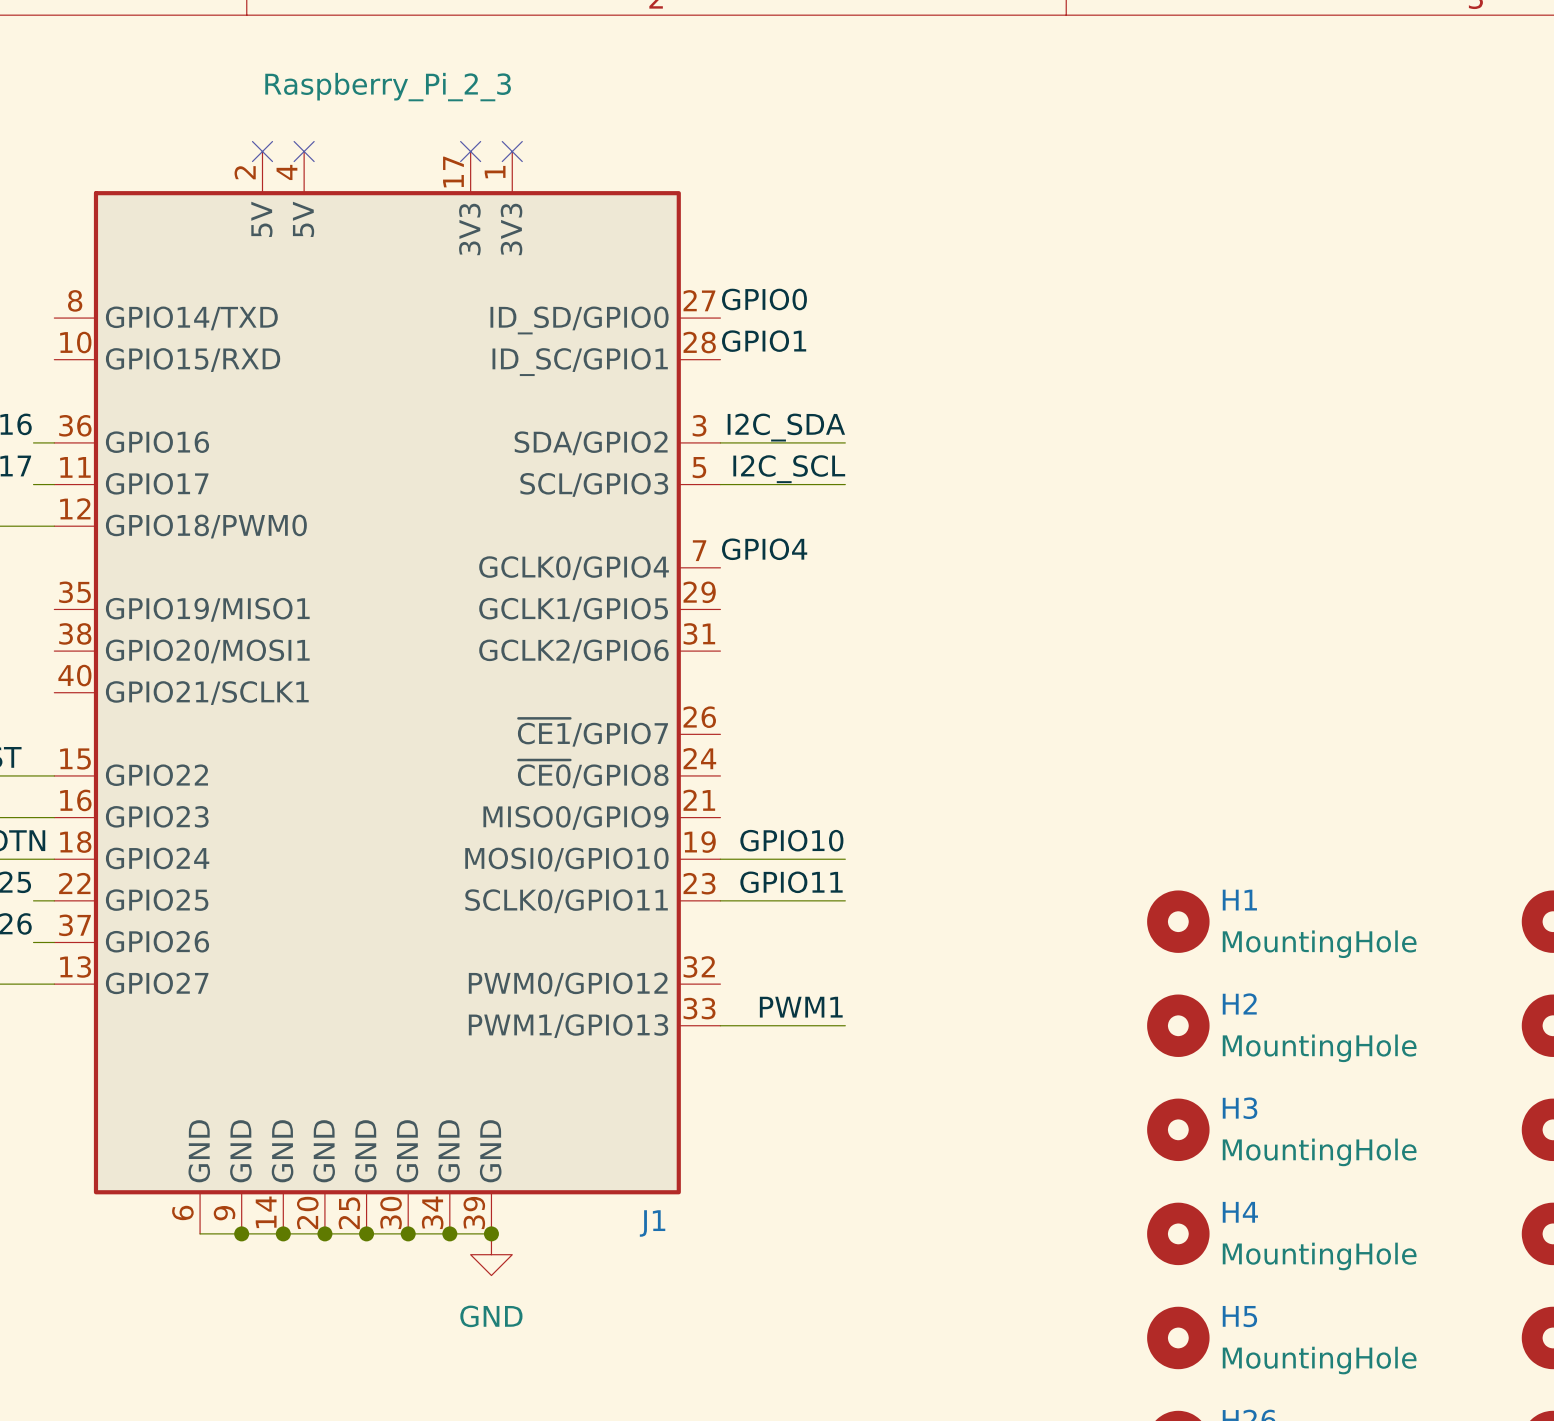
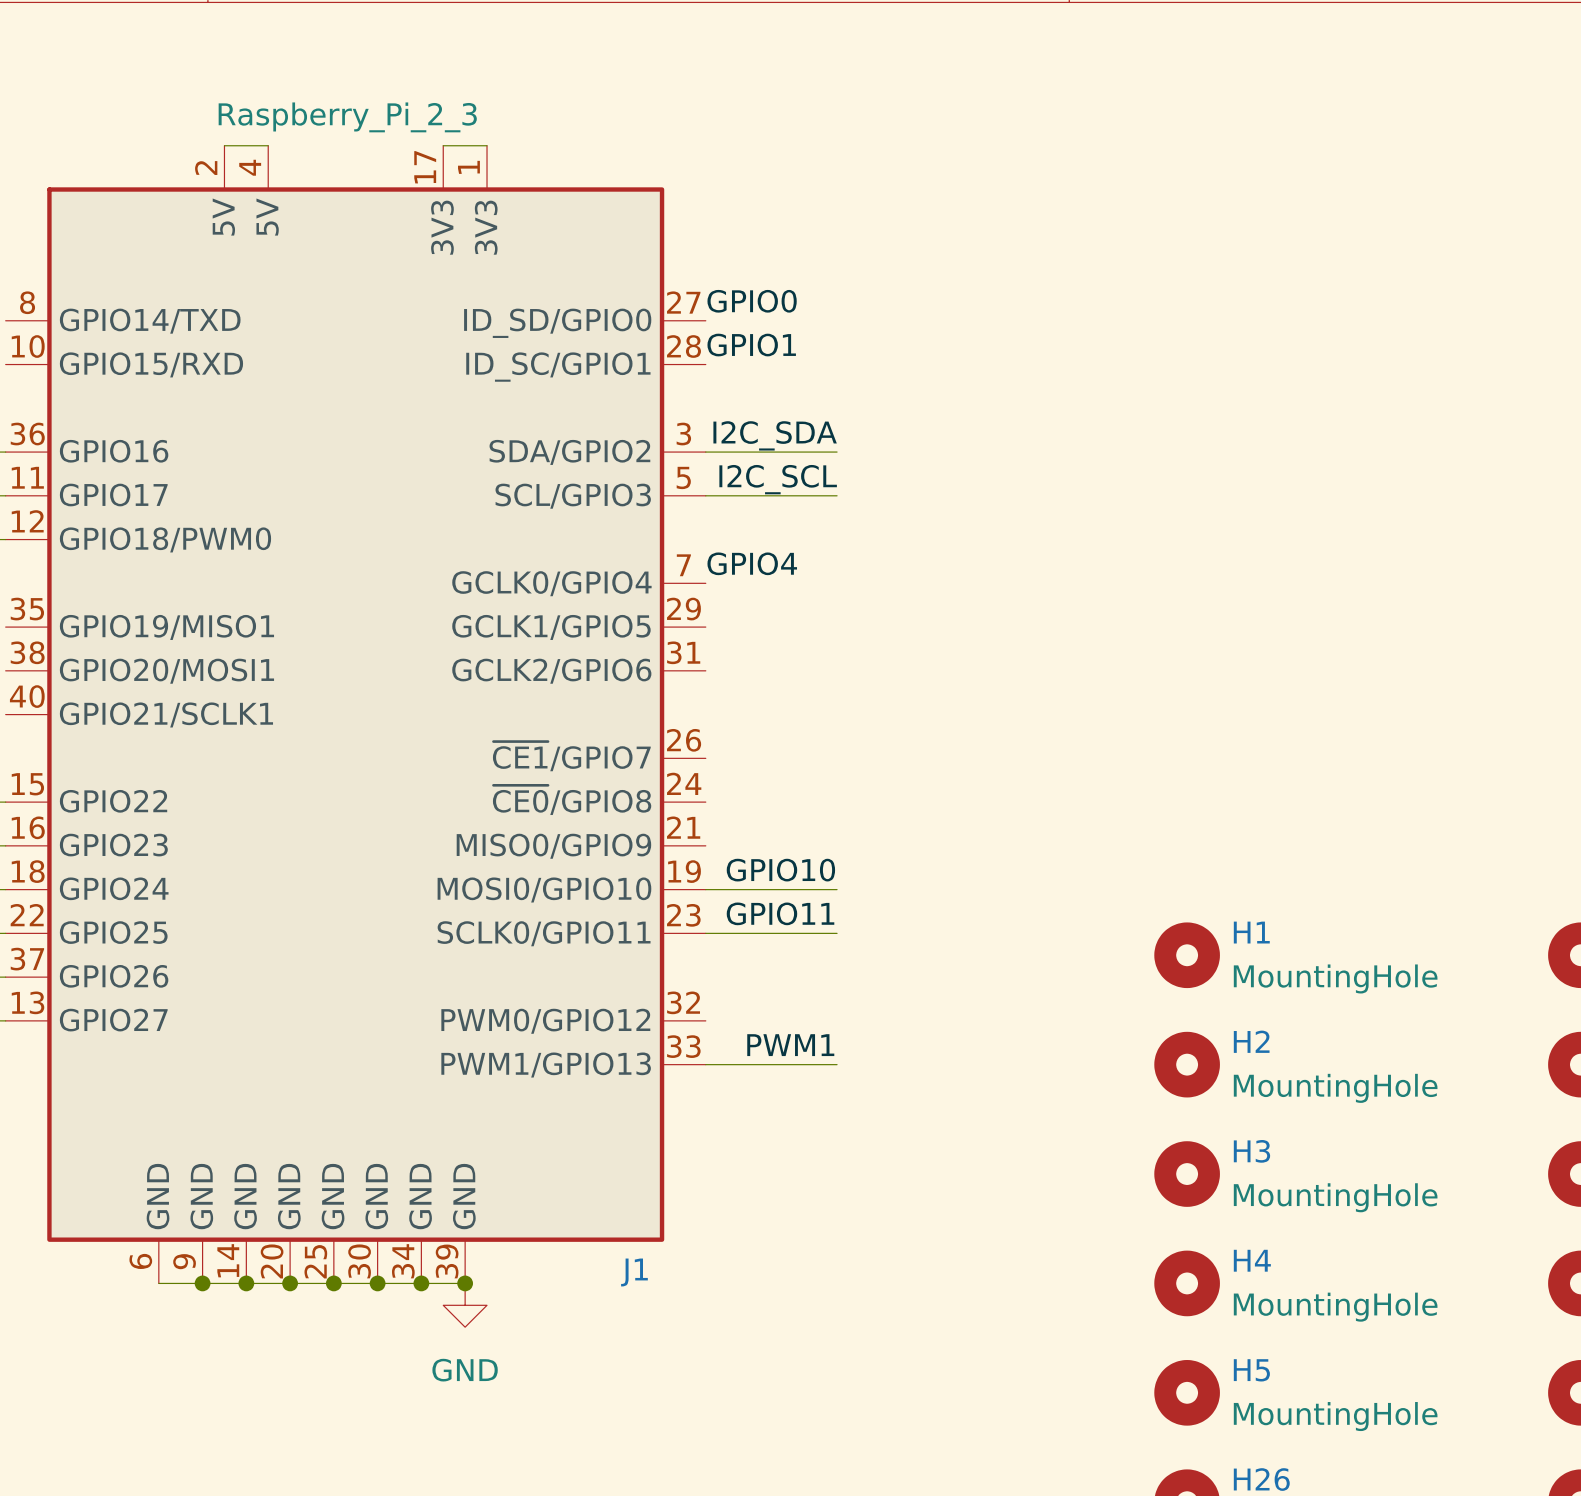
J1 value position: Raspberry_Pi_2_3 (388, 87) -> Raspberry_Pi_2_3 (347, 117)
wire: none -> (224, 145) (268, 145)
no-connect mark: (262, 151) -> none
no-connect mark: (304, 151) -> none
wire: none -> (443, 145) (487, 145)
no-connect mark: (470, 151) -> none
no-connect mark: (512, 151) -> none

